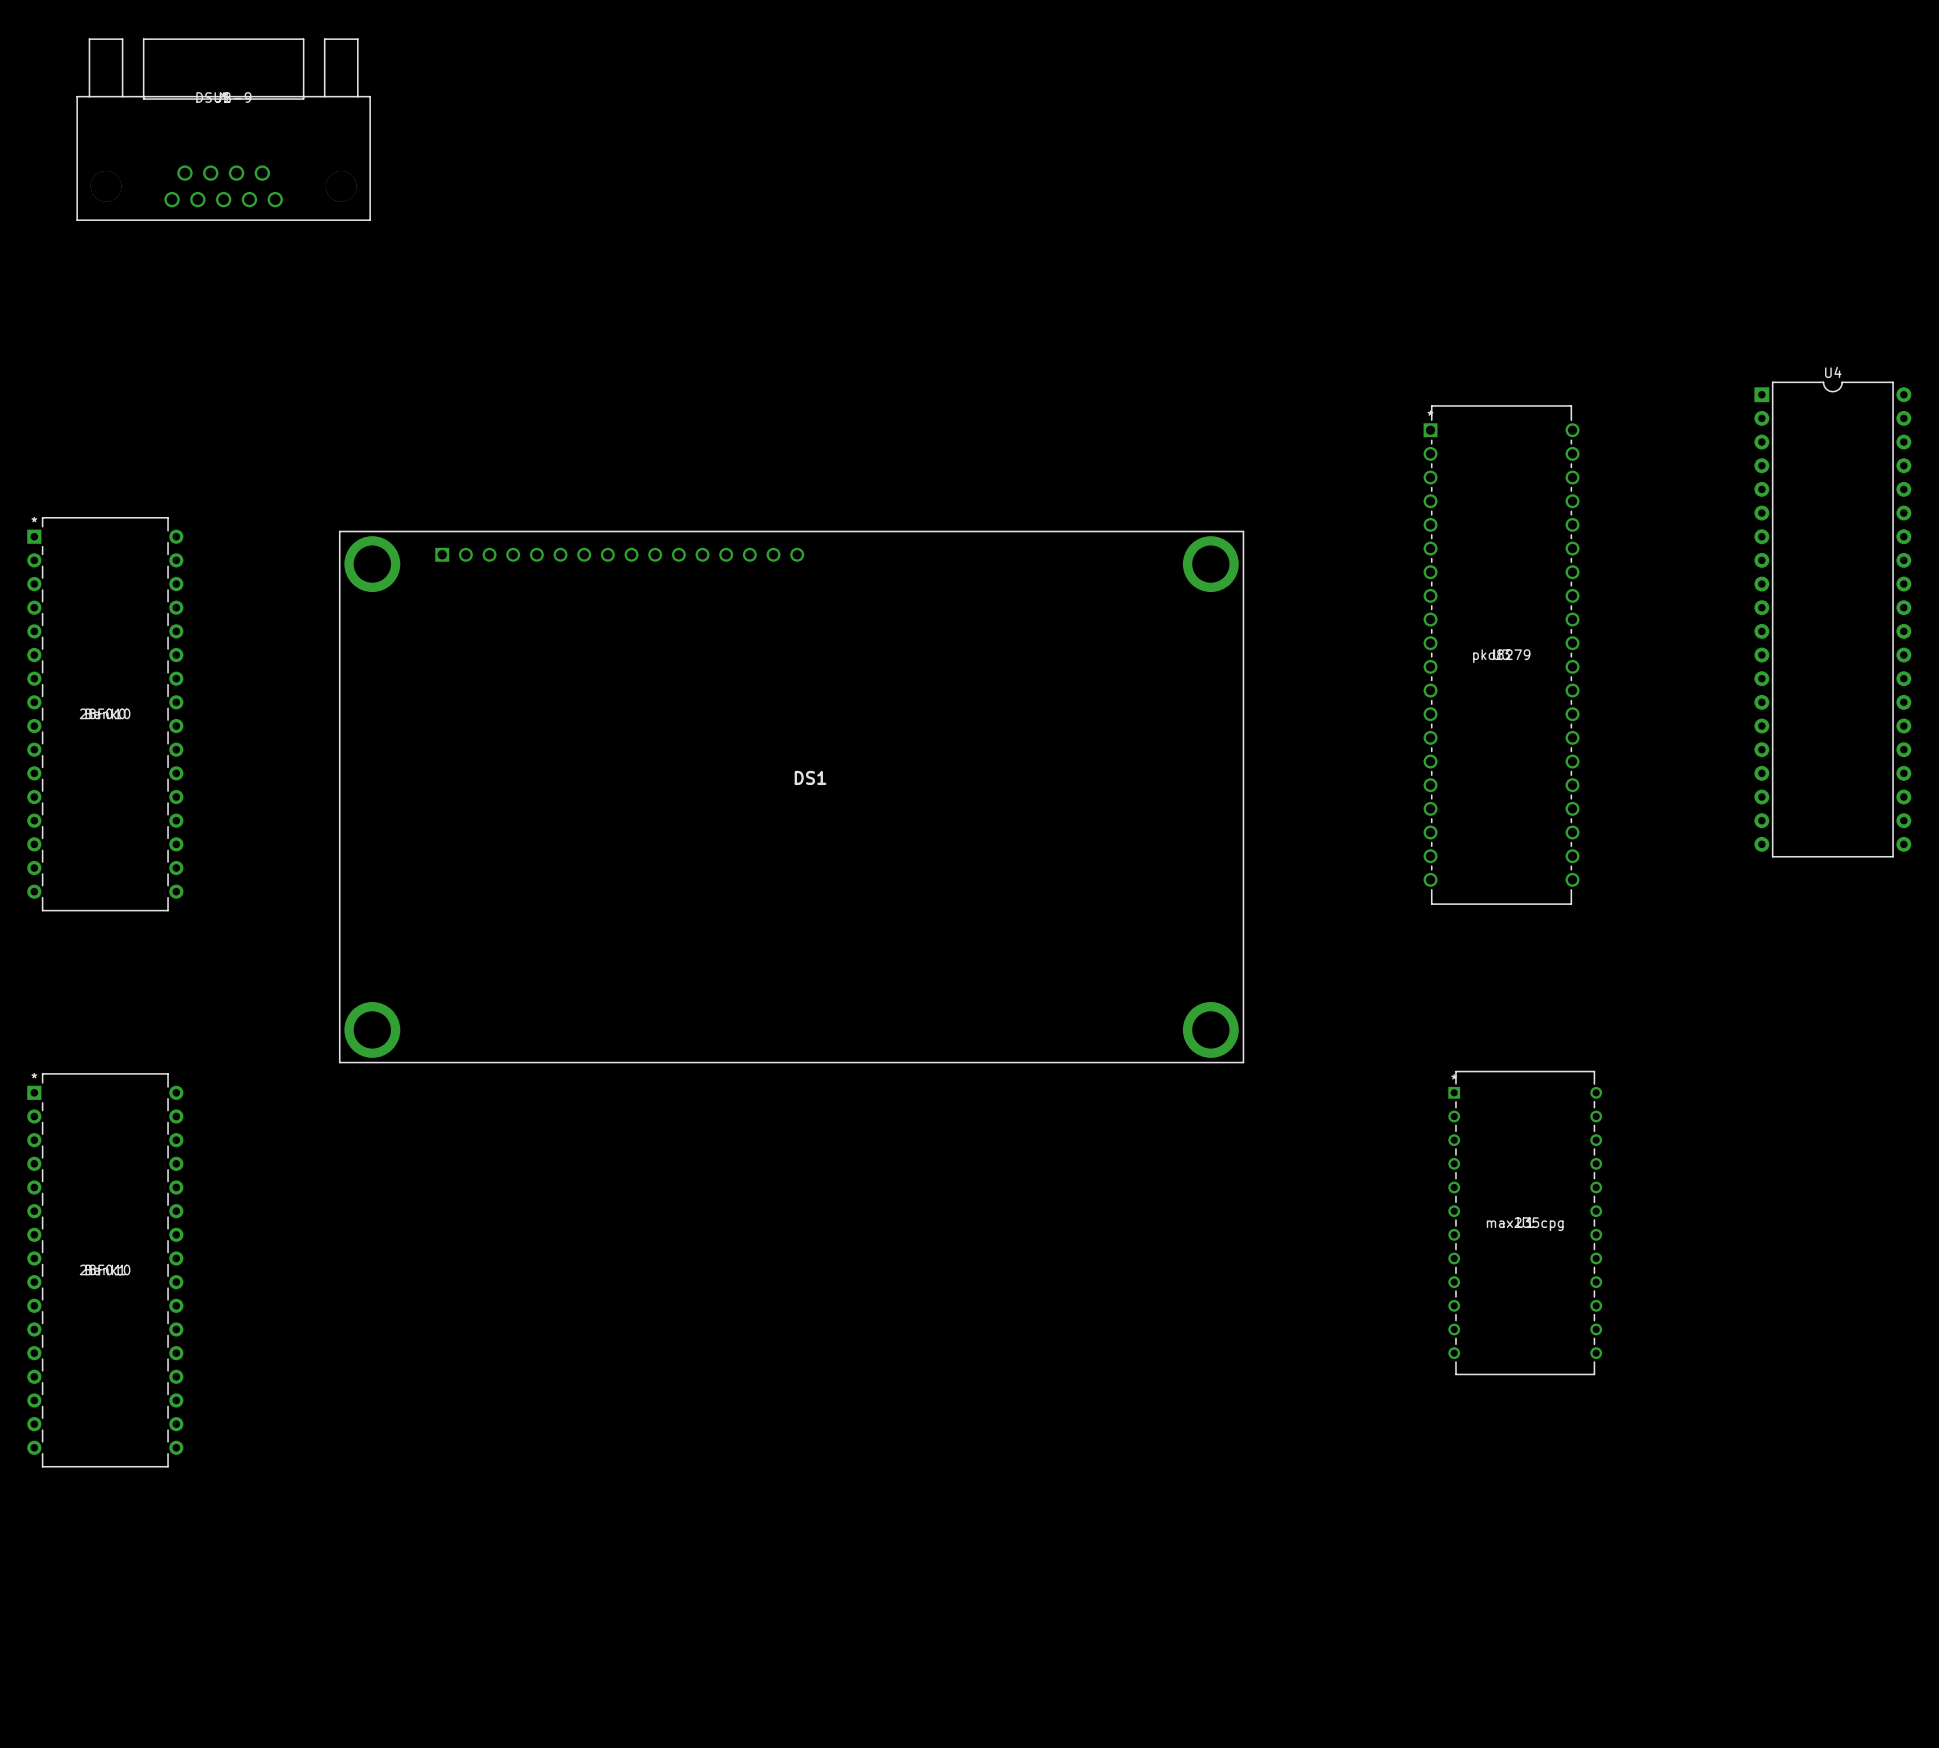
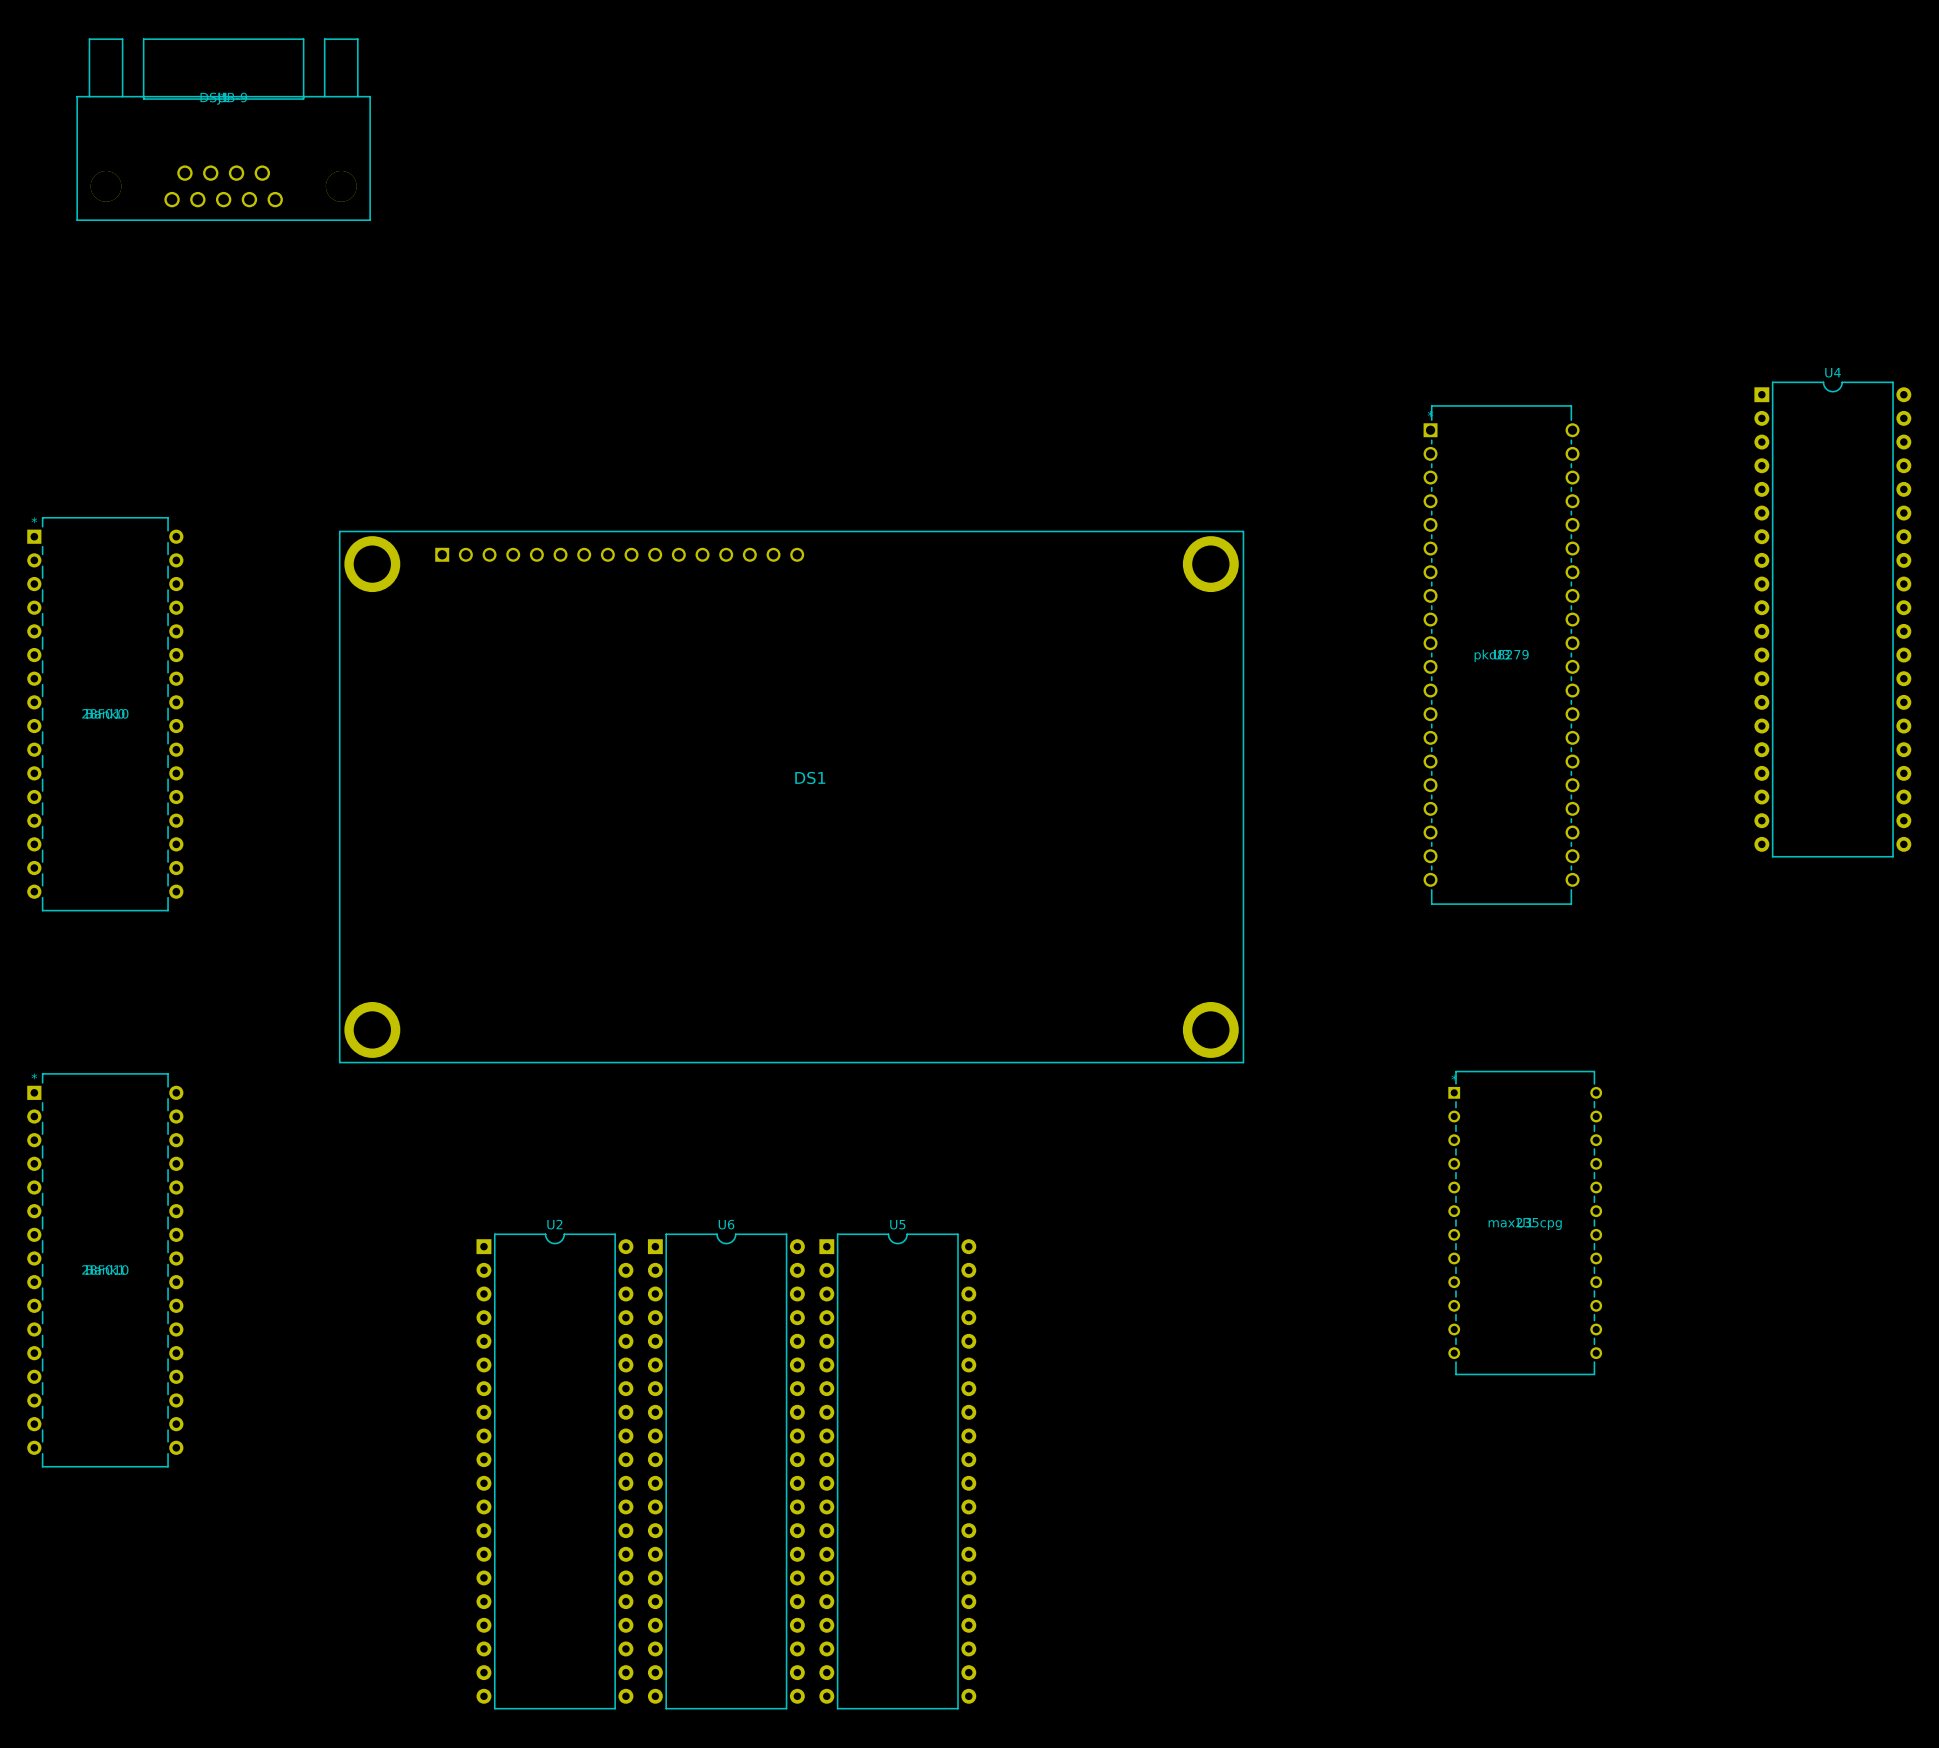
U2: none -> (554, 1471)
U6: none -> (726, 1471)
U5: none -> (897, 1471)

